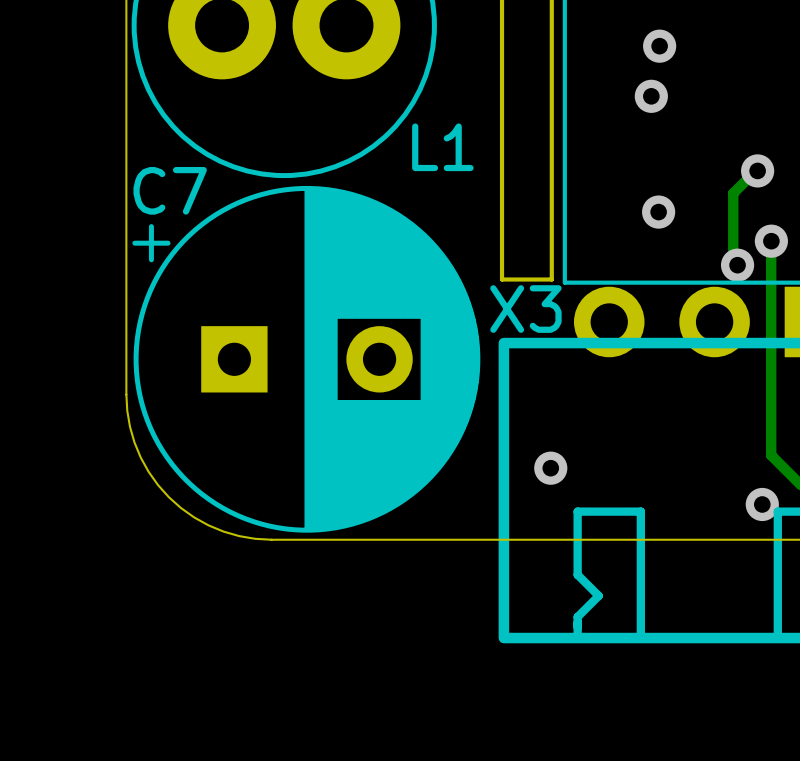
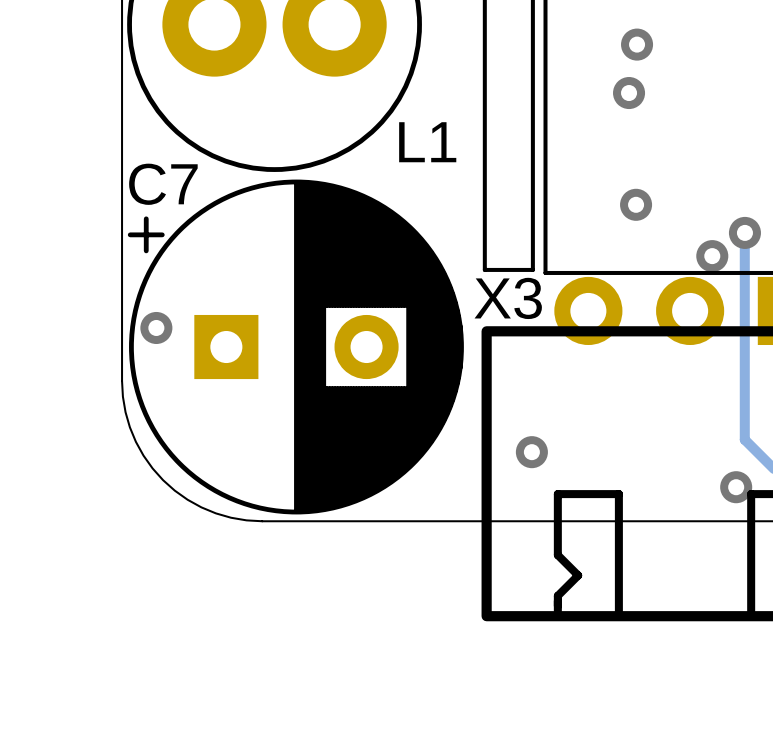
track: (757, 170) (733, 193) (733, 260) -> none
via: (757, 170) -> none
via: none -> (156, 327)

